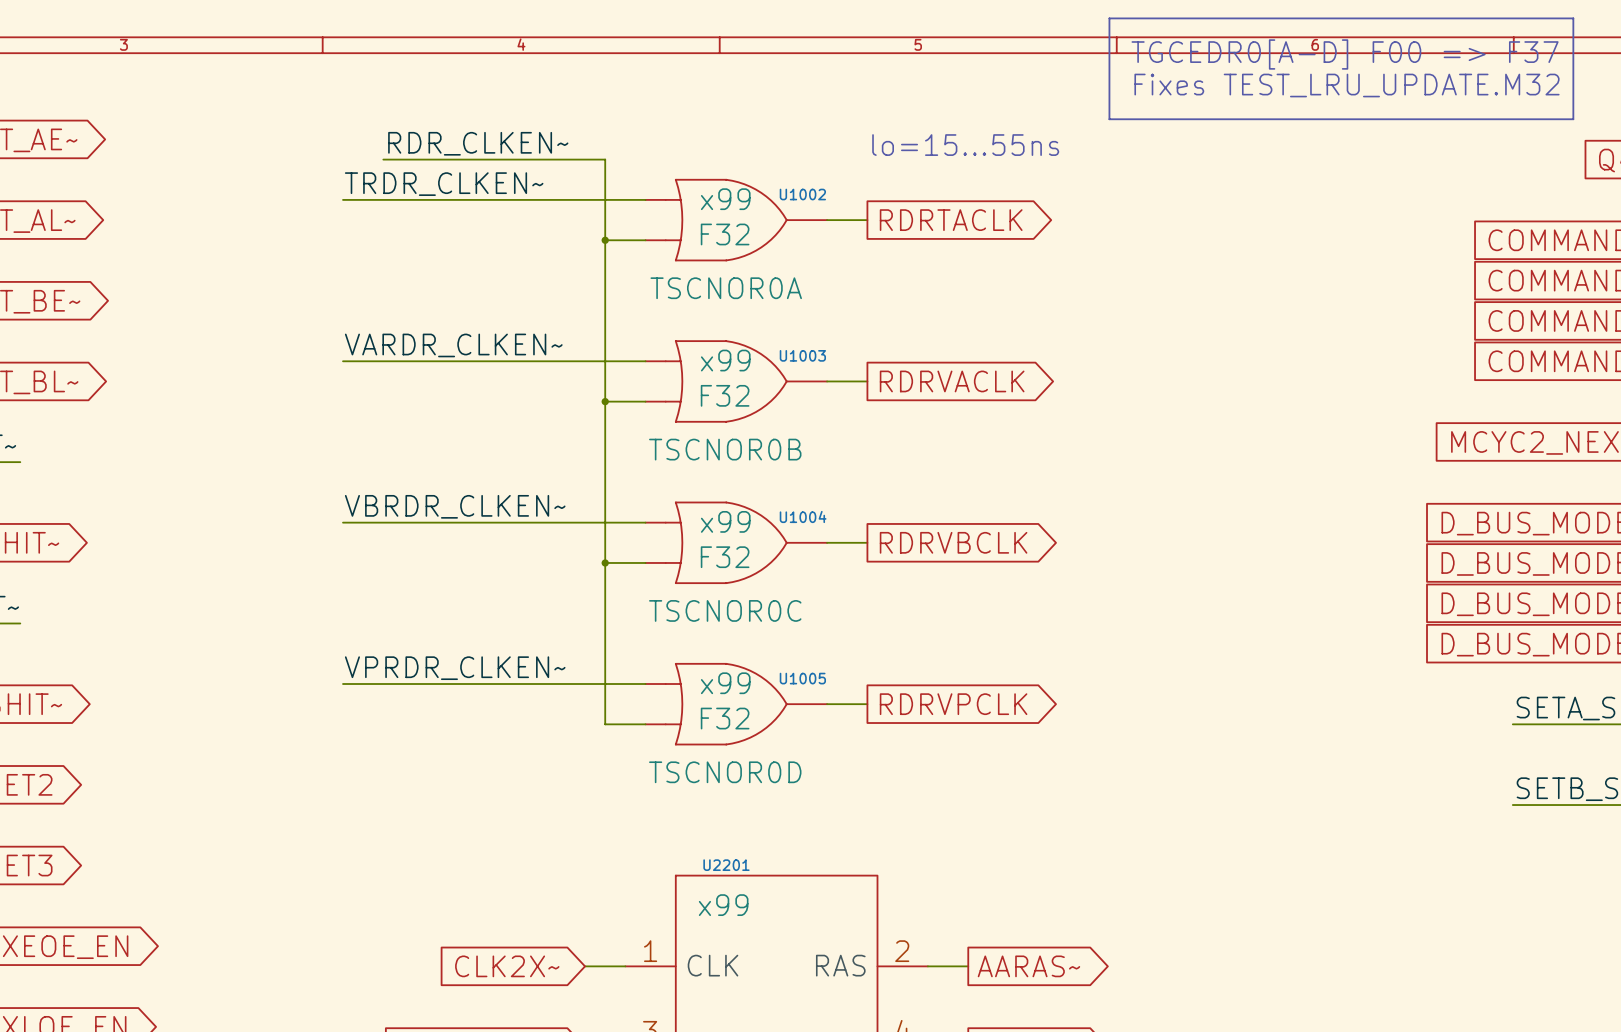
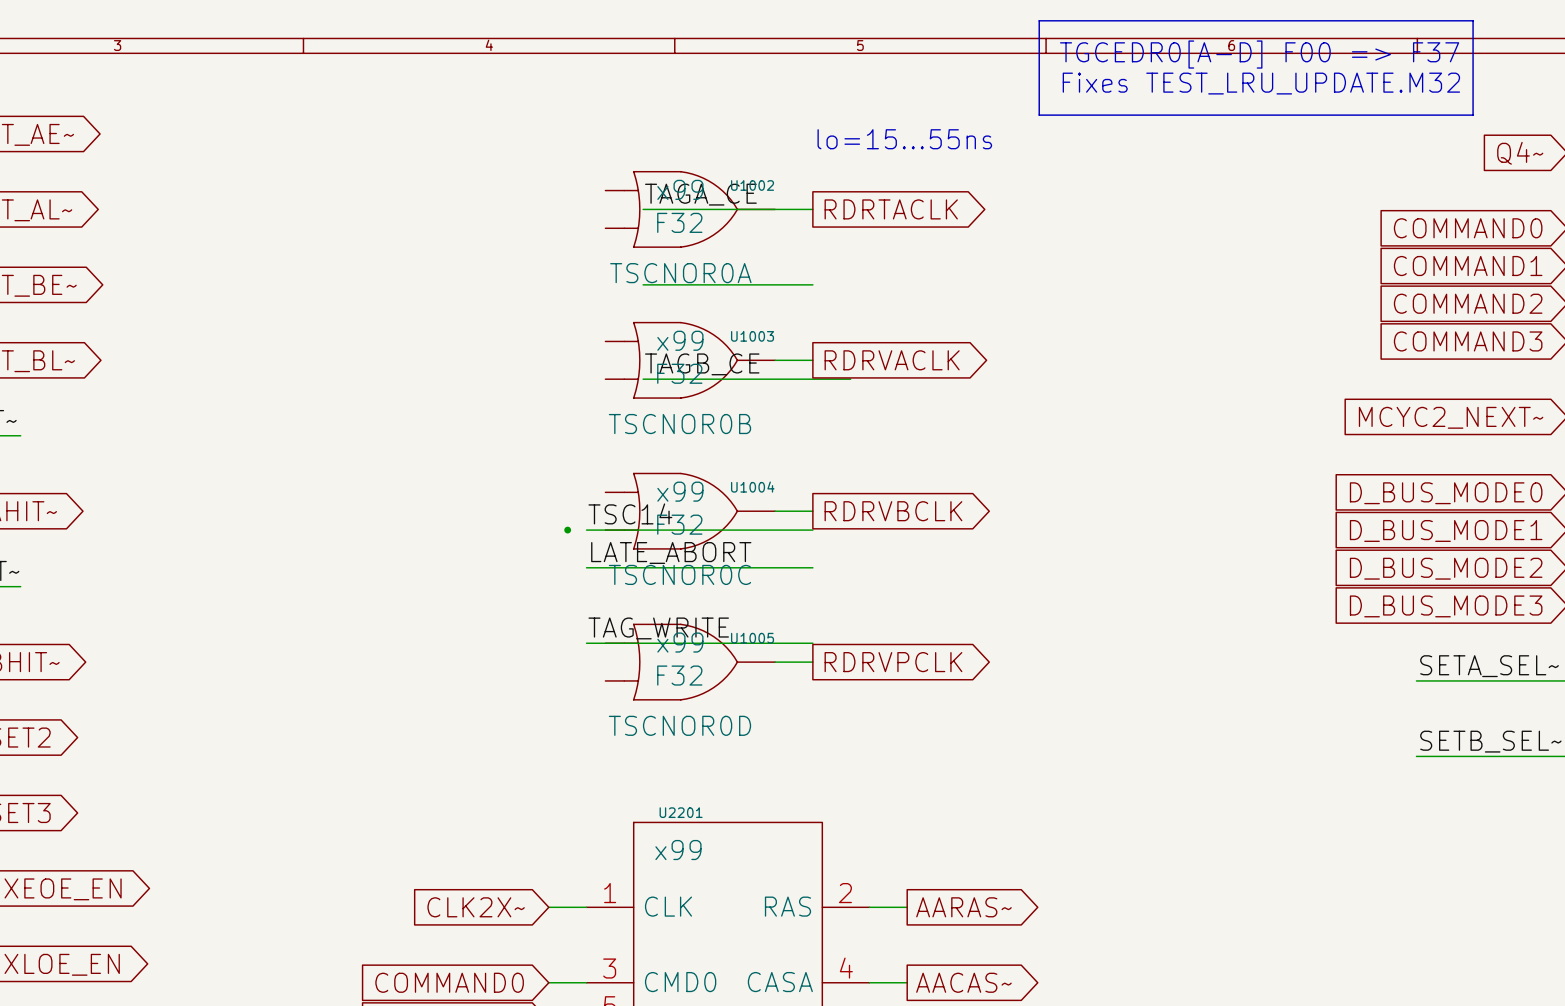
label: RDR_CLKEN~ (478, 143) -> none
wire: (383, 159) (605, 159) (605, 724) (645, 724) -> none
label: TRDR_CLKEN~ (444, 184) -> none
wire: (343, 199) (645, 199) -> none
label: none -> TAGA_CE (700, 194)
wire: none -> (643, 209) (775, 209)
wire: (605, 240) (645, 240) -> none
junction: (605, 240) -> none
wire: none -> (643, 284) (812, 284)
label: VARDR_CLKEN~ (453, 345) -> none
wire: (343, 361) (645, 361) -> none
label: none -> TAGB_CE (702, 364)
wire: (605, 401) (645, 401) -> none
junction: (605, 401) -> none
wire: none -> (643, 379) (850, 379)
label: VBRDR_CLKEN~ (455, 506) -> none
wire: (343, 522) (645, 522) -> none
label: none -> TSC14 (630, 513)
wire: (605, 562) (625, 562) -> none
wire: none -> (605, 530) (812, 530)
label: none -> LATE_ABORT (671, 552)
wire: none -> (586, 567) (812, 567)
label: VPRDR_CLKEN~ (455, 668) -> none
label: none -> TAG_WRITE (658, 628)
wire: (343, 684) (625, 684) -> none
wire: none -> (605, 643) (812, 643)

